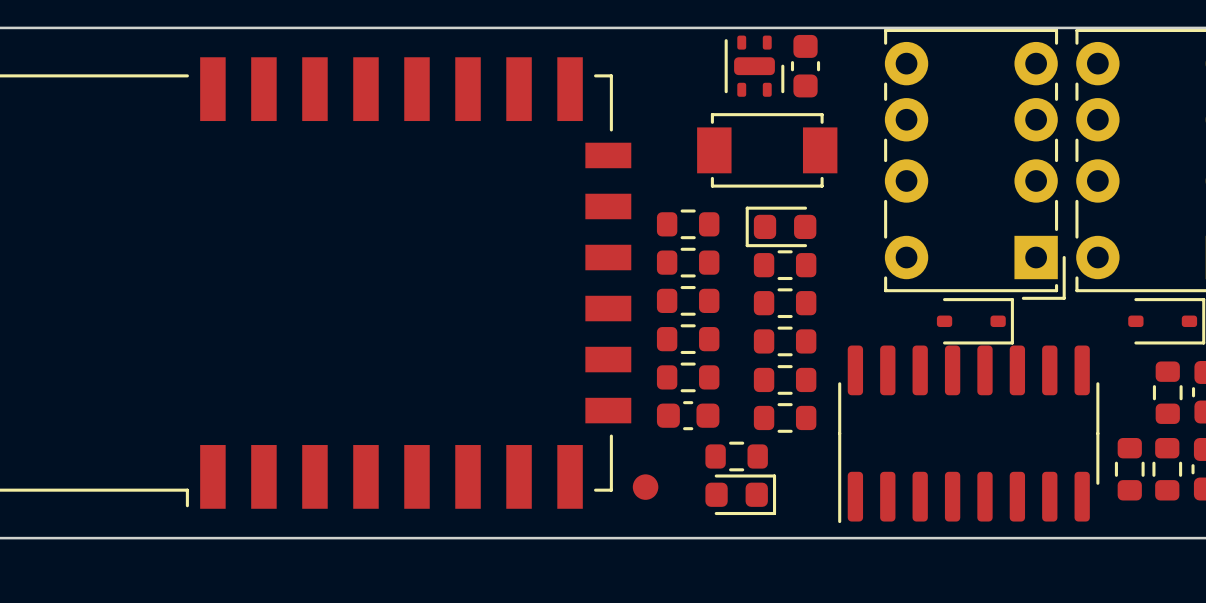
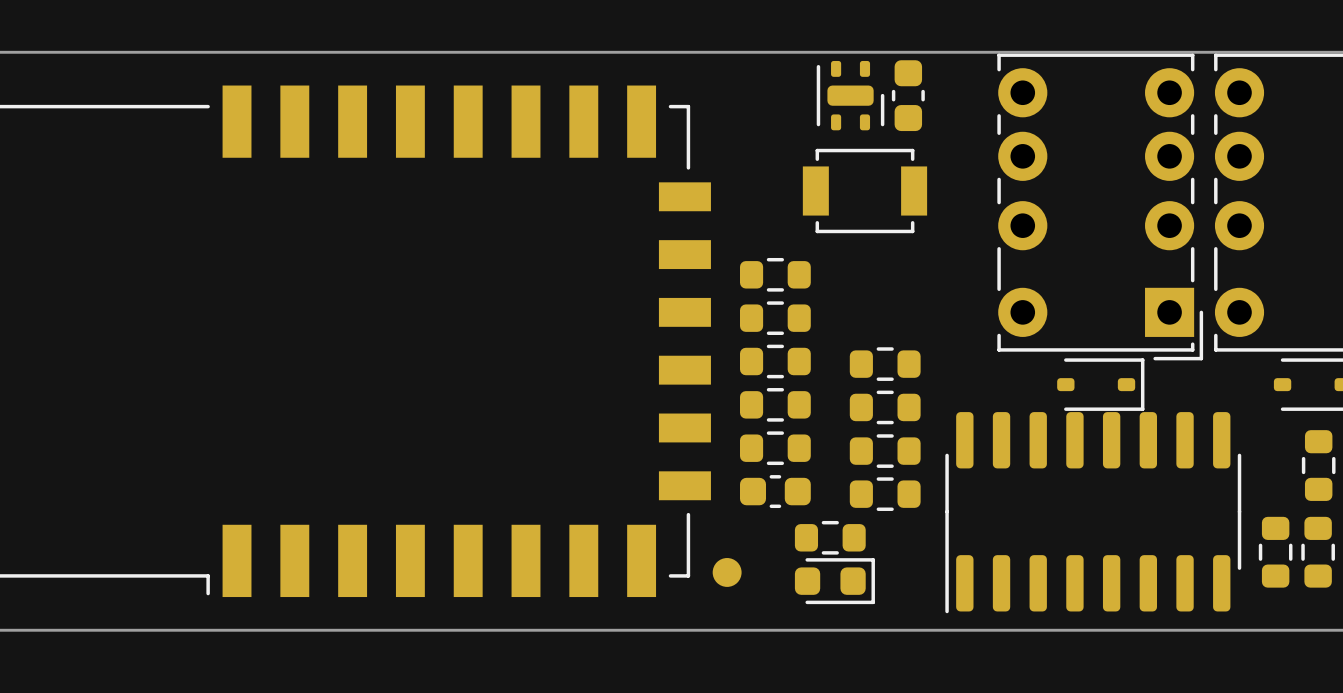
part footprint: [697, 113, 838, 188] -> [802, 148, 928, 234]
part: (781, 226) -> none
part: (785, 265) -> none

